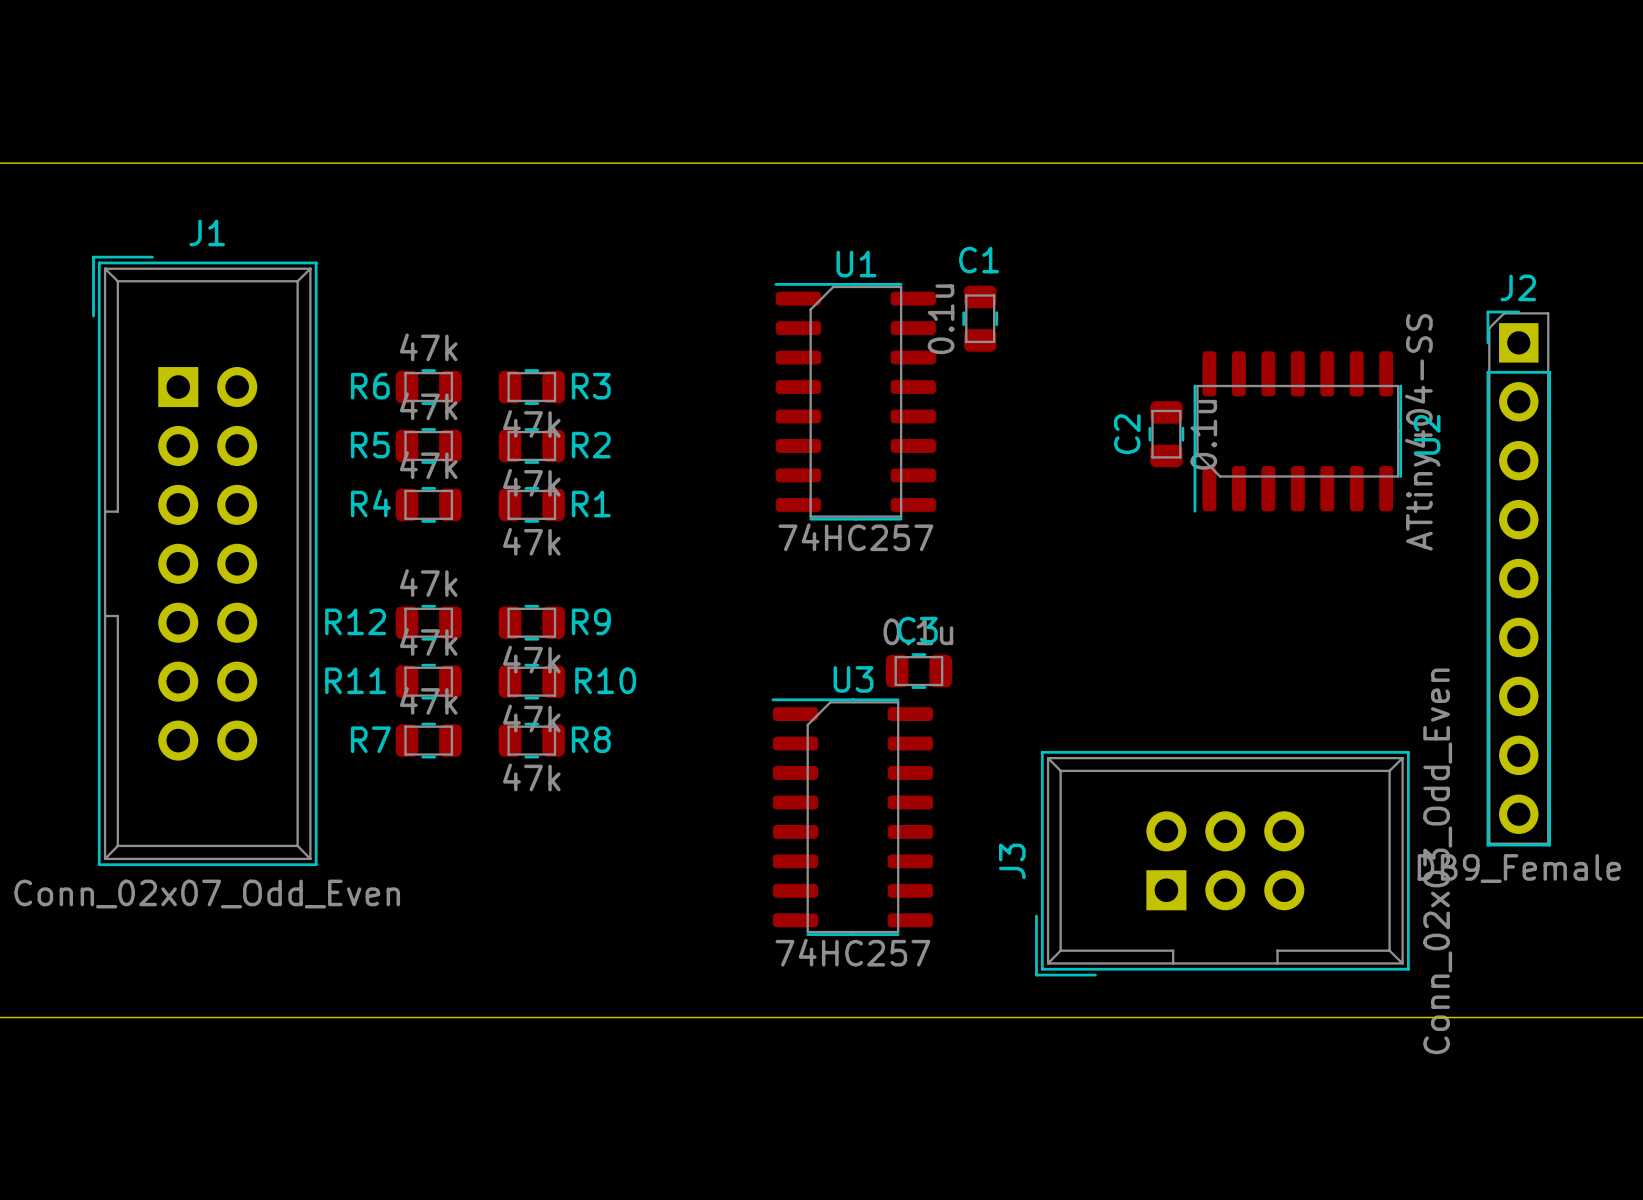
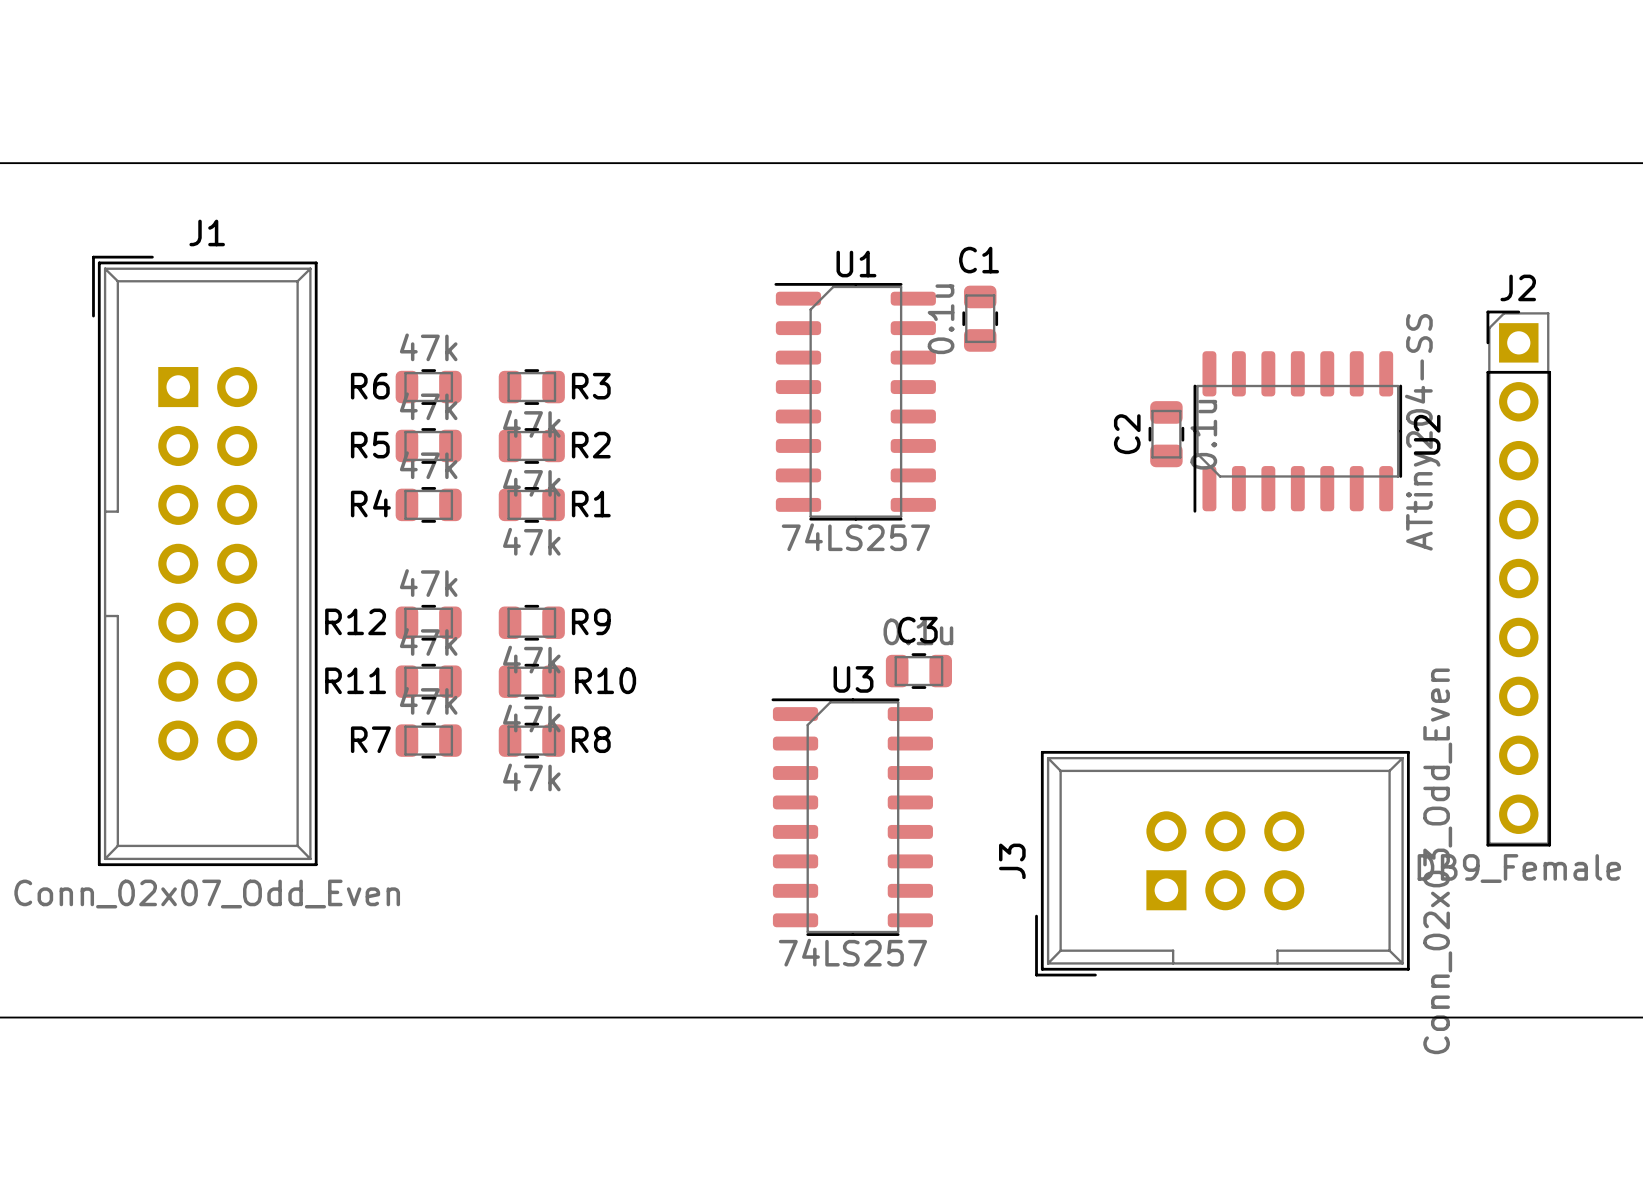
U2 value: ATtiny404-SS (1422, 432) -> ATtiny204-SS (1422, 432)
U1 value: 74HC257 (855, 537) -> 74LS257 (855, 537)
U3 value: 74HC257 (852, 952) -> 74LS257 (852, 952)

